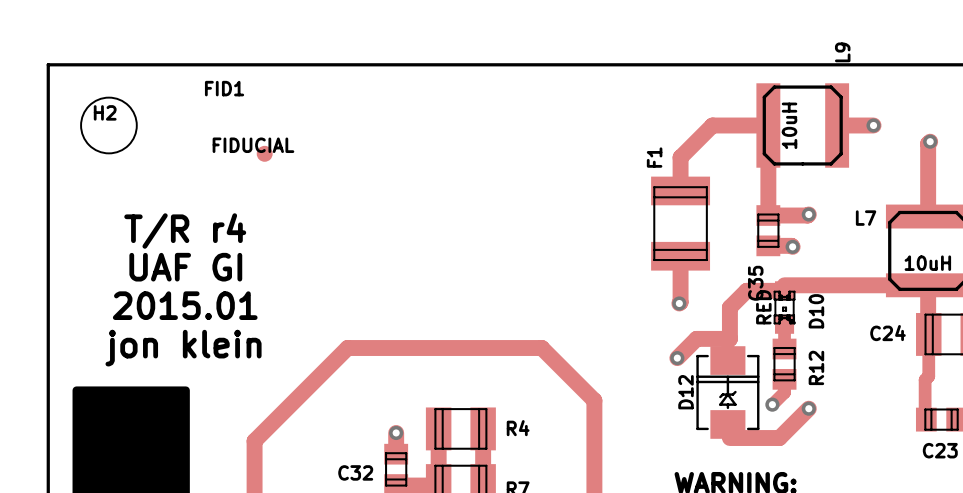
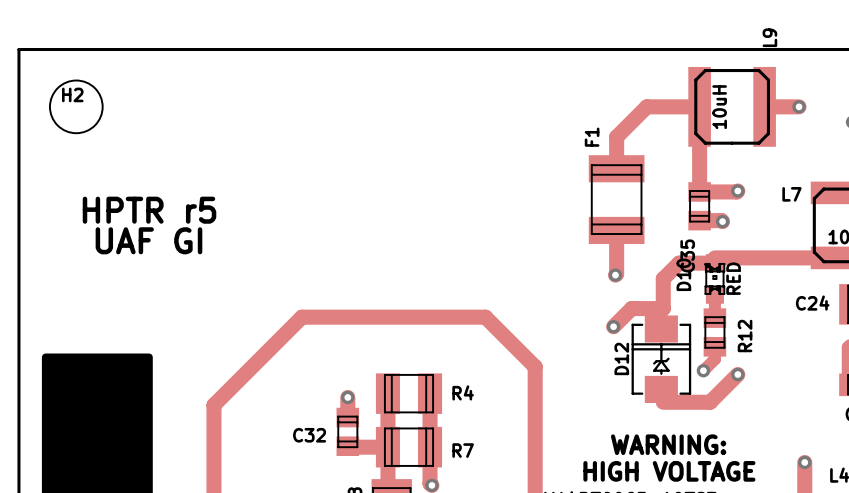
FID1: FIDUCIAL (264, 153) -> none
text: T/R r4 (185, 231) -> HPTR r5 (149, 210)
text: 2015.01 (185, 305) -> none
D10 rotation: 0° (784, 307) -> 180° (714, 278)
text: jon klein (183, 348) -> none

